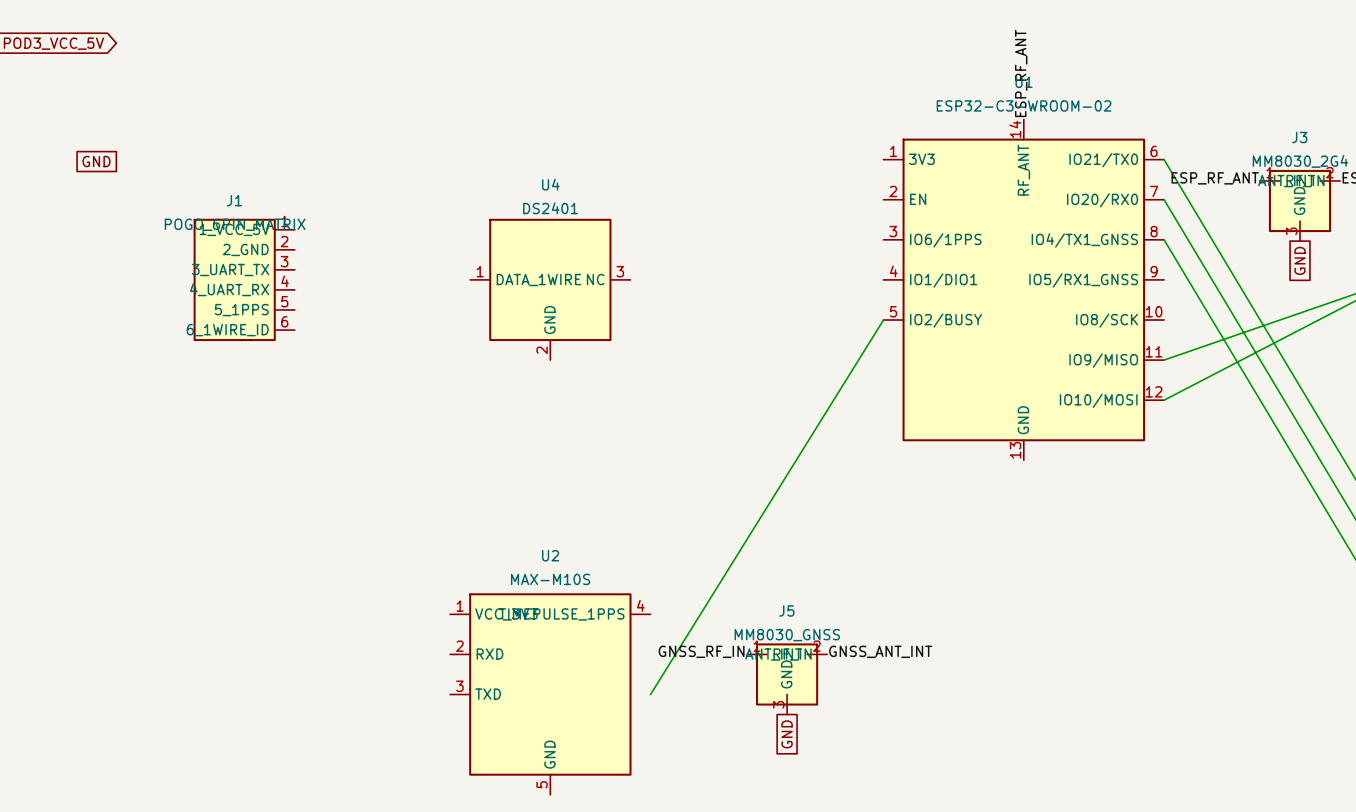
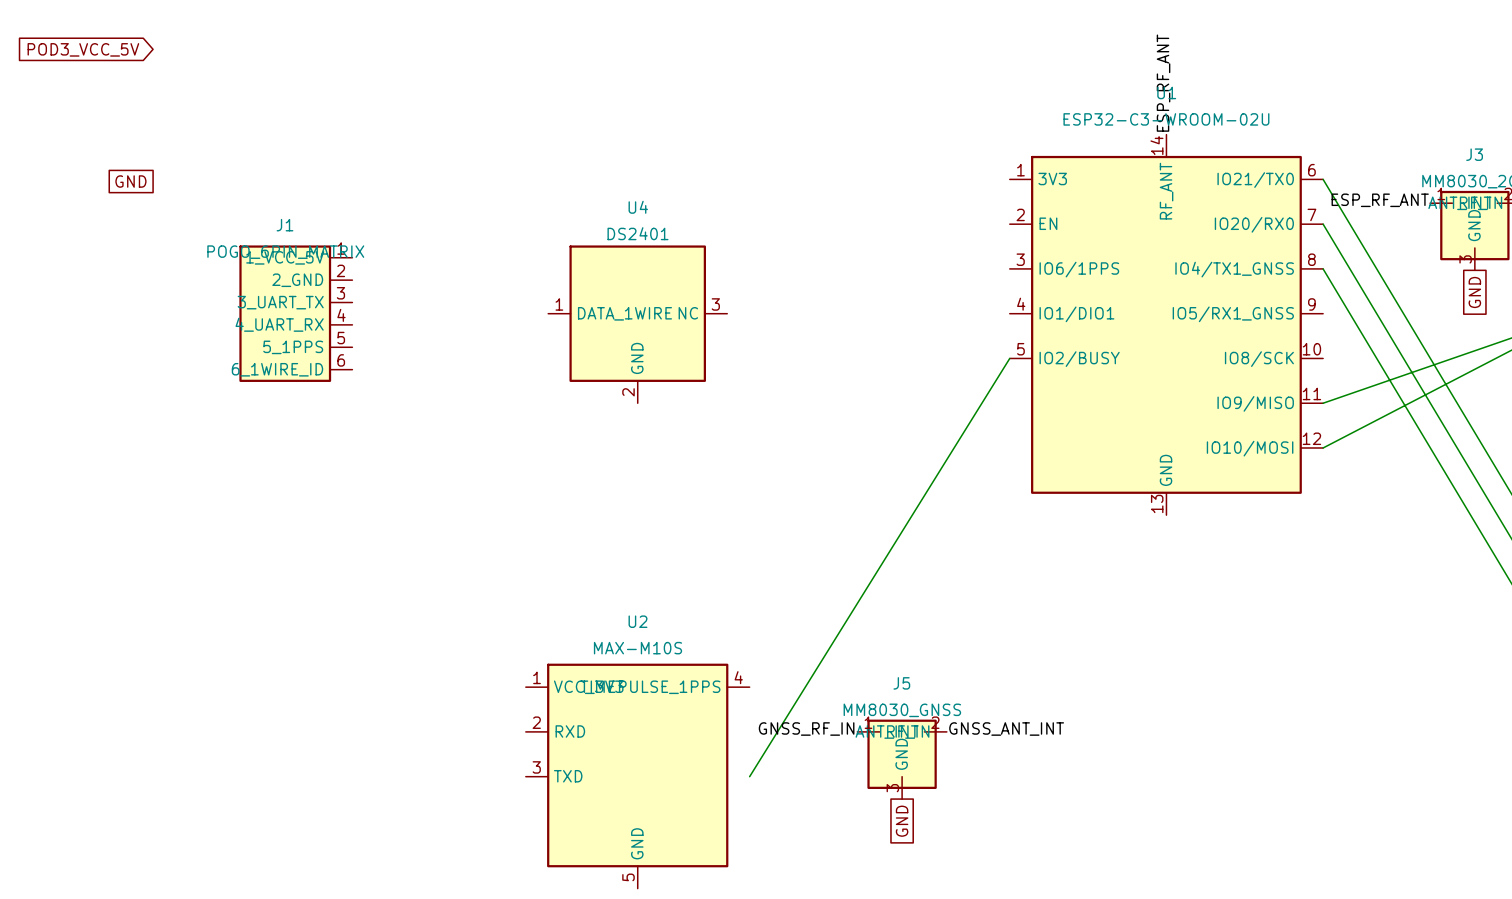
U1 value: ESP32-C3-WROOM-02 (1024, 105) -> ESP32-C3-WROOM-02U (1166, 119)

